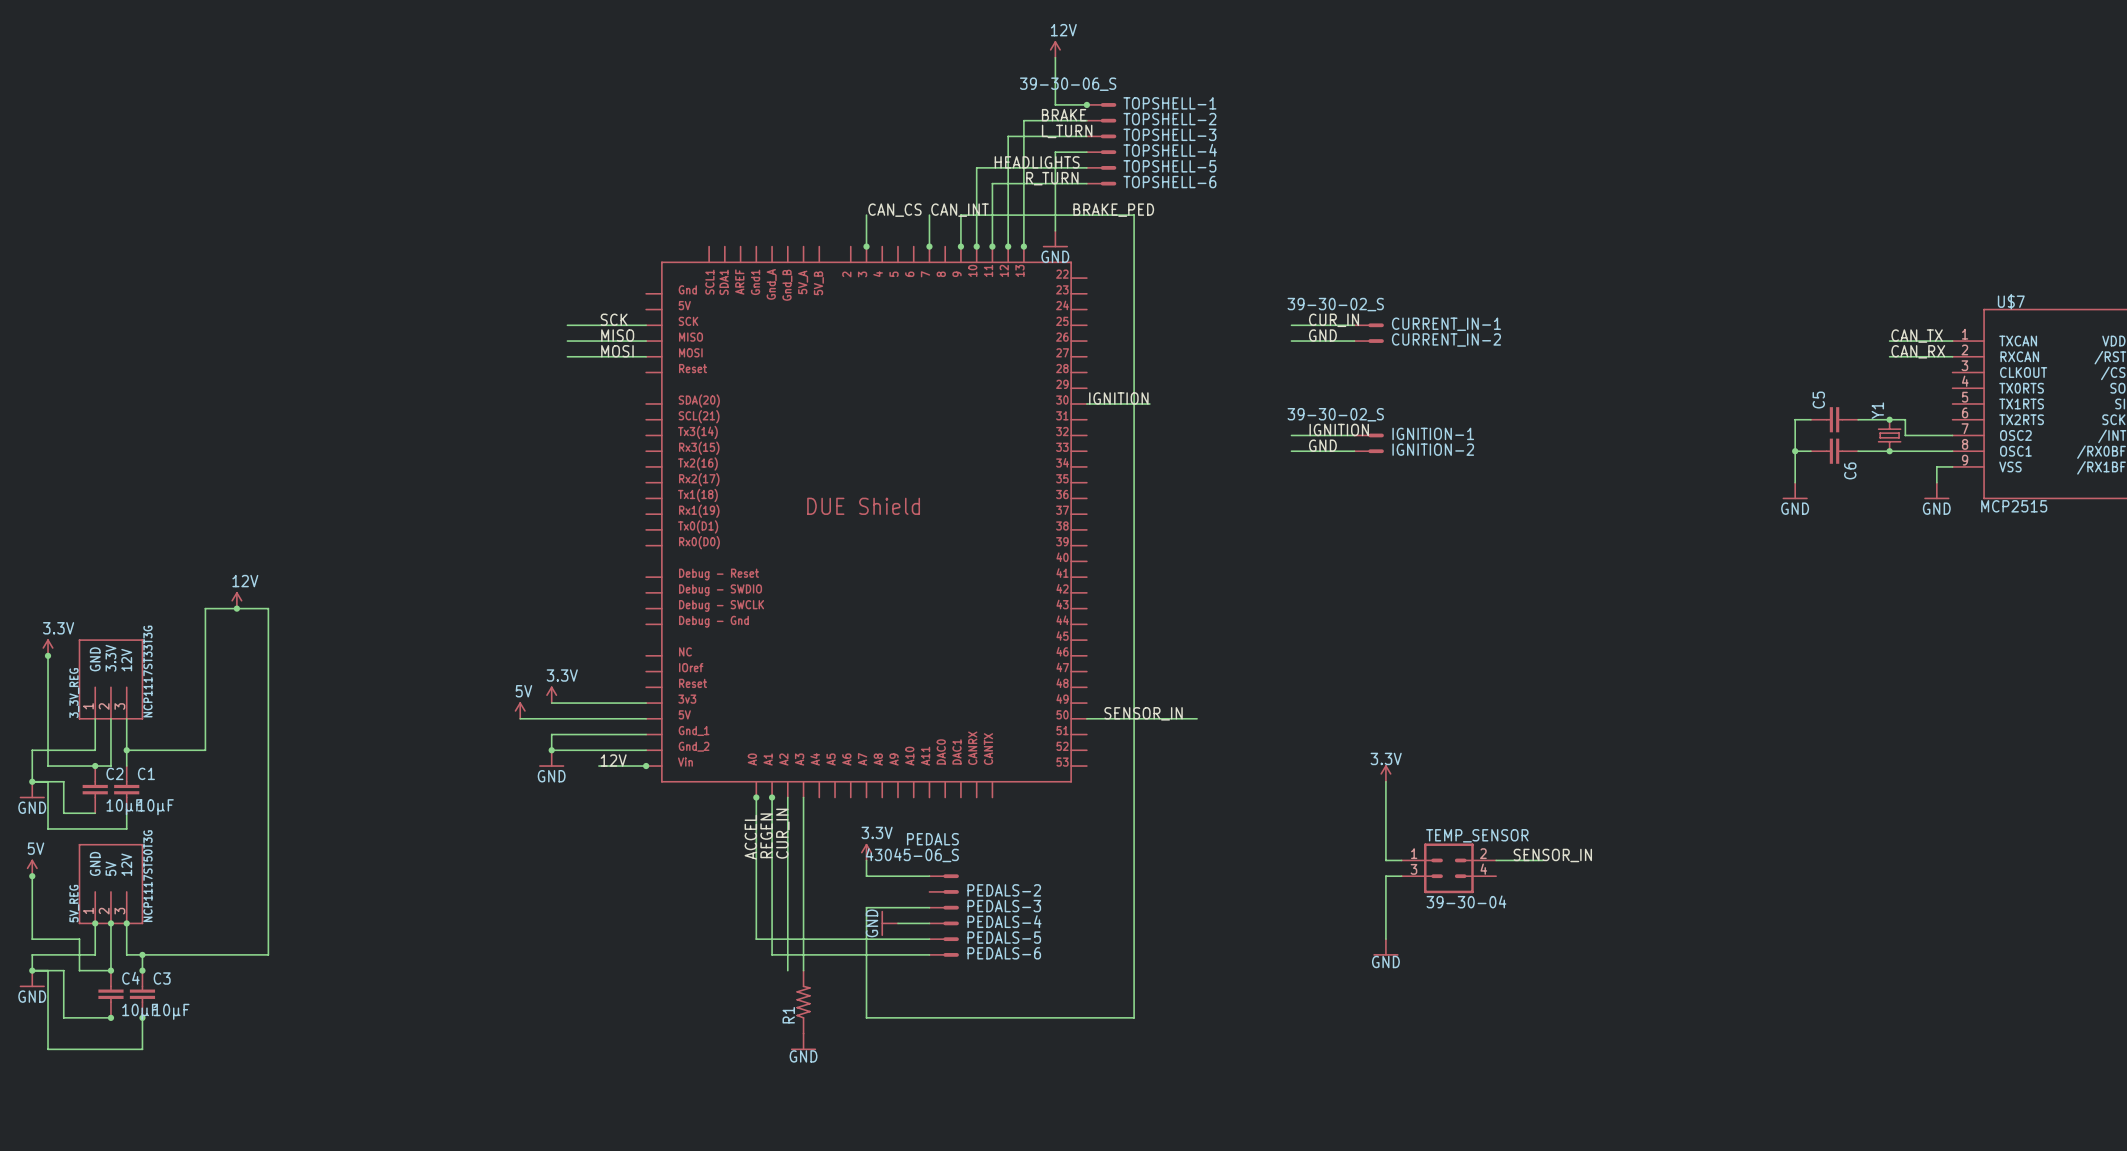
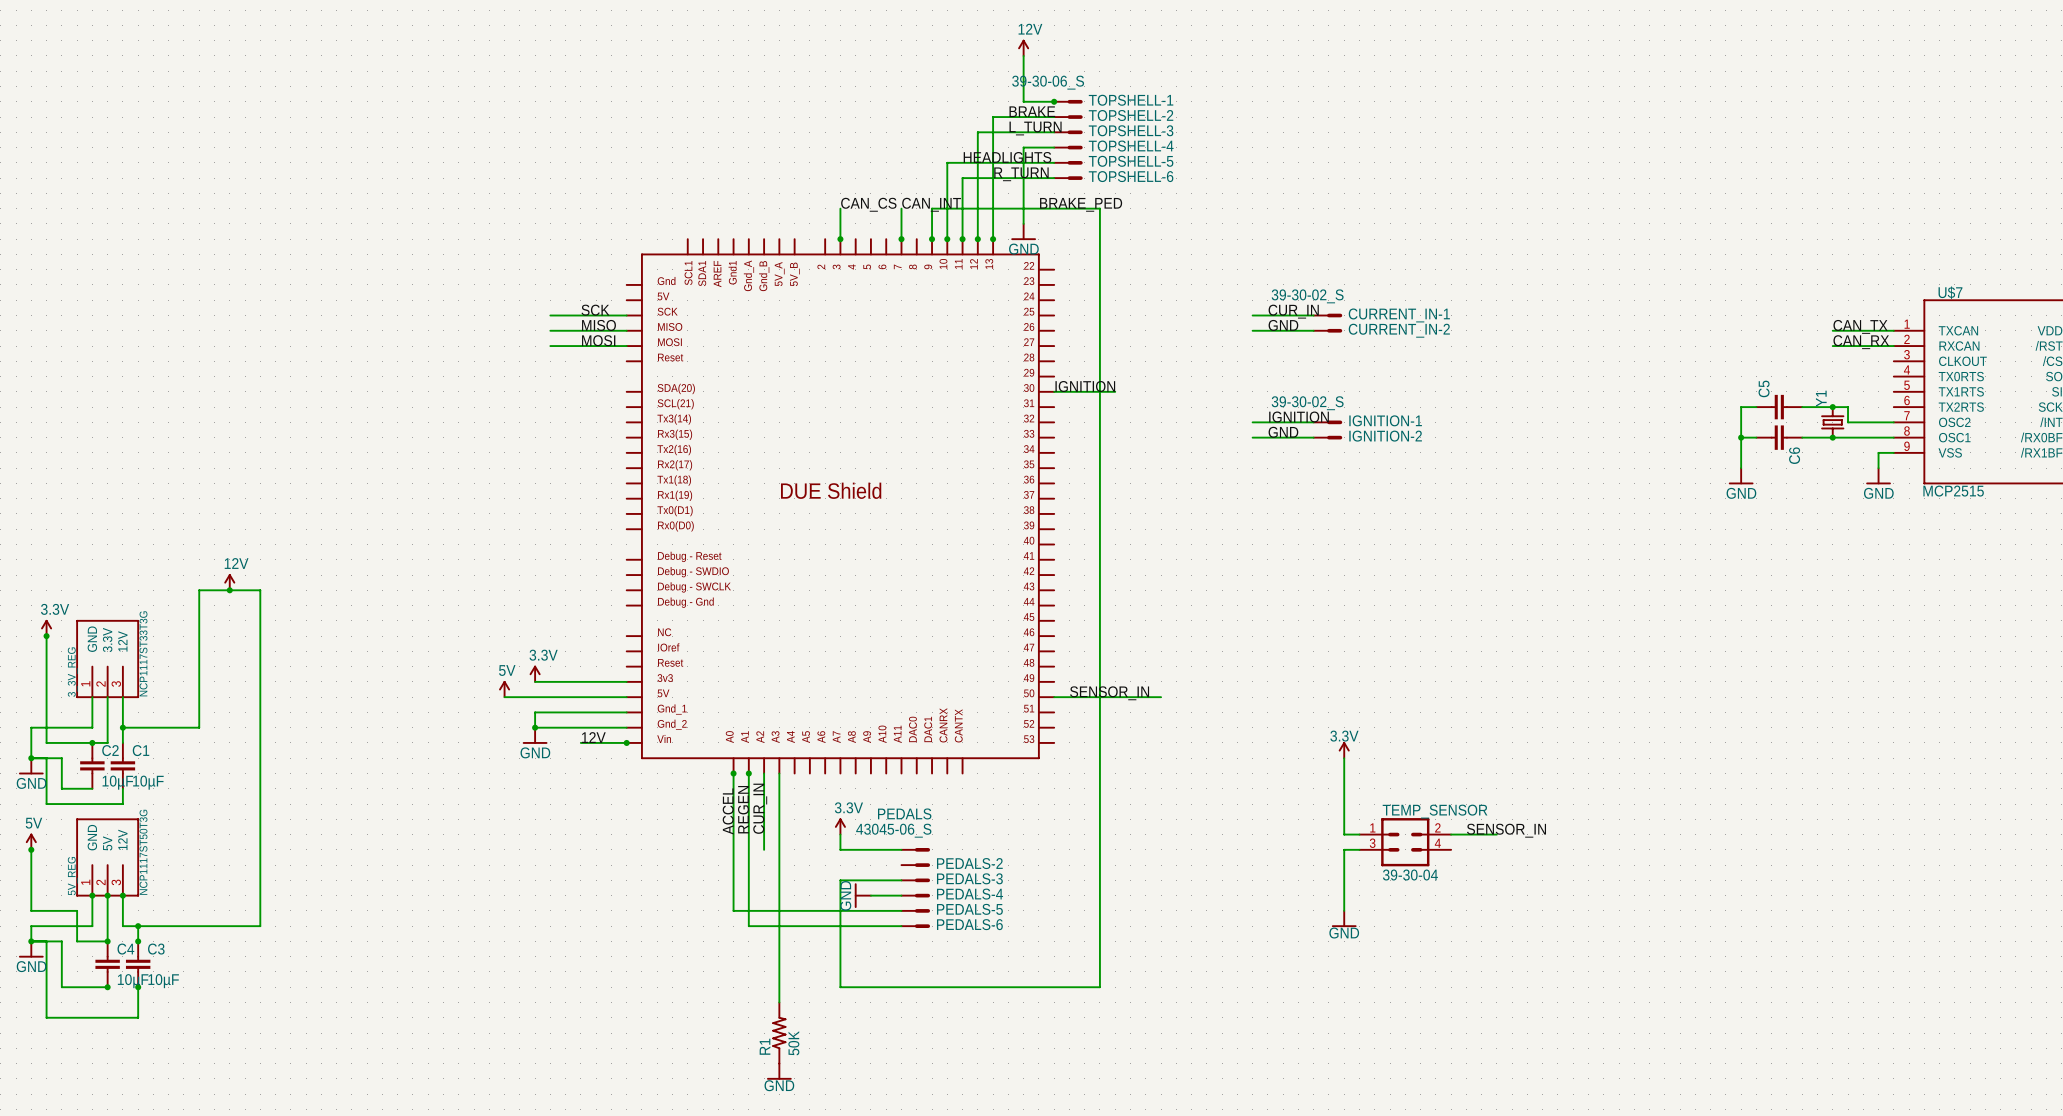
wire: (787, 876) (787, 970) -> none
R1 position: (803, 1002) -> (779, 1033)
power symbol position: GND (803, 1041) -> GND (779, 1071)
R1 value: none -> 50K (793, 1043)

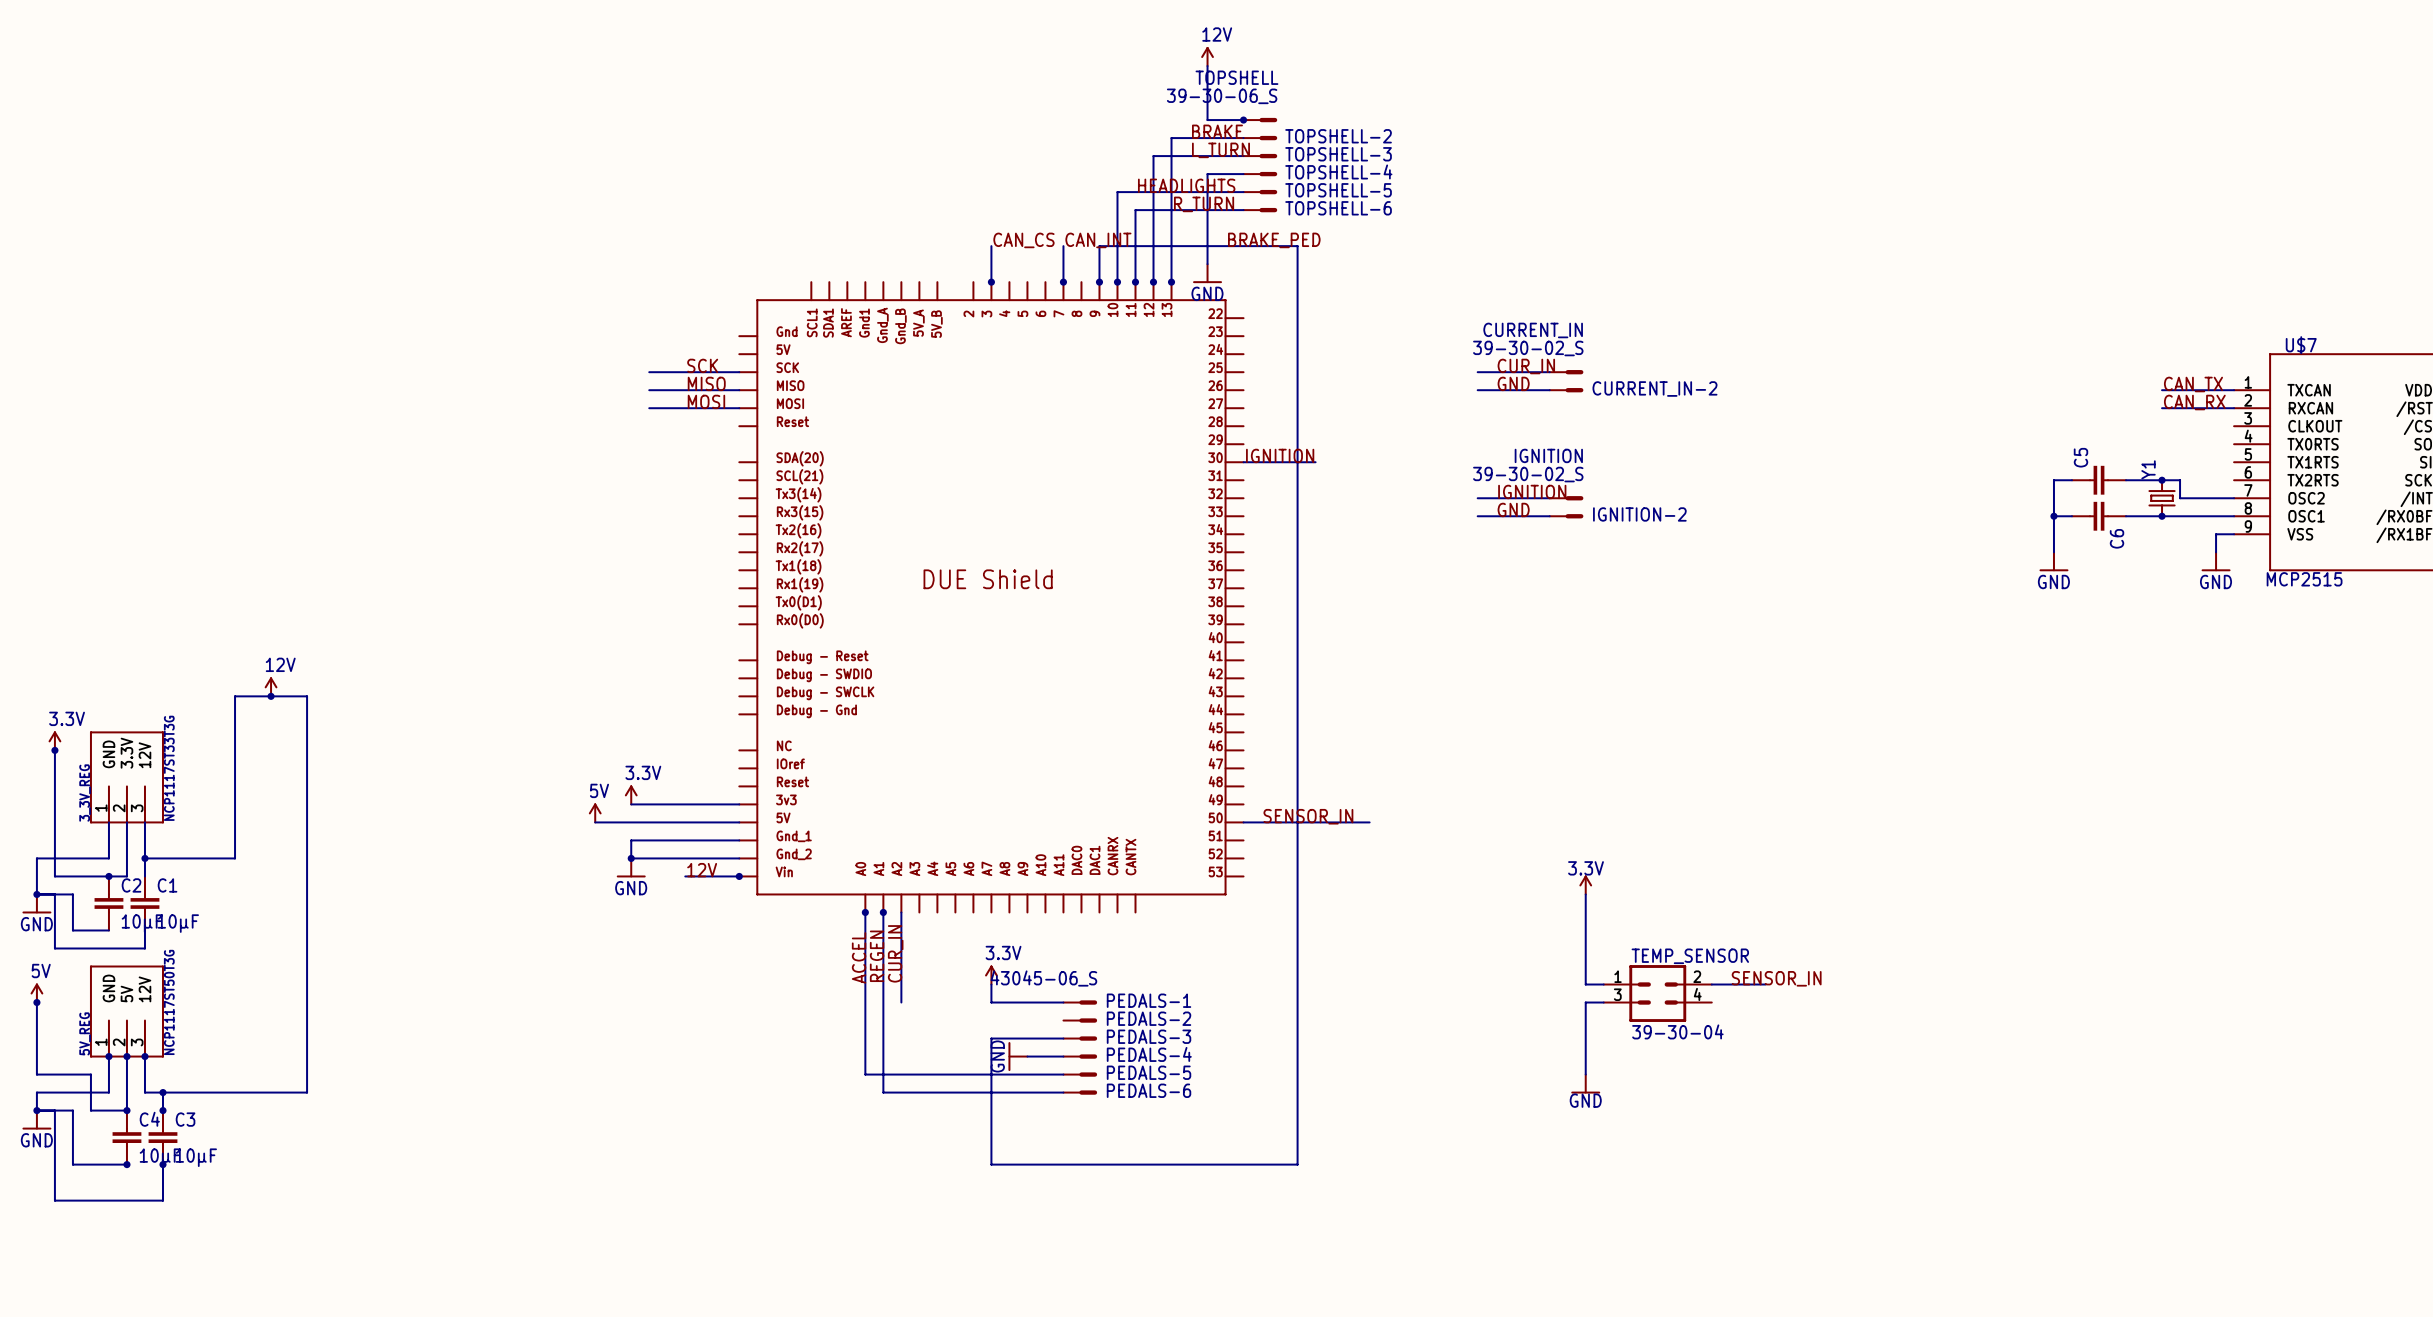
TOPSHELL-1 name: TOPSHELL-1 (1131, 100) -> TOPSHELL (1236, 77)
CURRENT_IN-1 name: CURRENT_IN-1 (1399, 315) -> CURRENT_IN (1533, 330)
IGNITION-1 name: IGNITION-1 (1385, 420) -> IGNITION (1548, 455)
wire: (779, 773) (779, 1002) -> none
PEDALS name: PEDALS (904, 813) -> PEDALS-1 (1149, 1000)
R1: 50K (779, 1033) -> none
power symbol: GND (779, 1071) -> none

